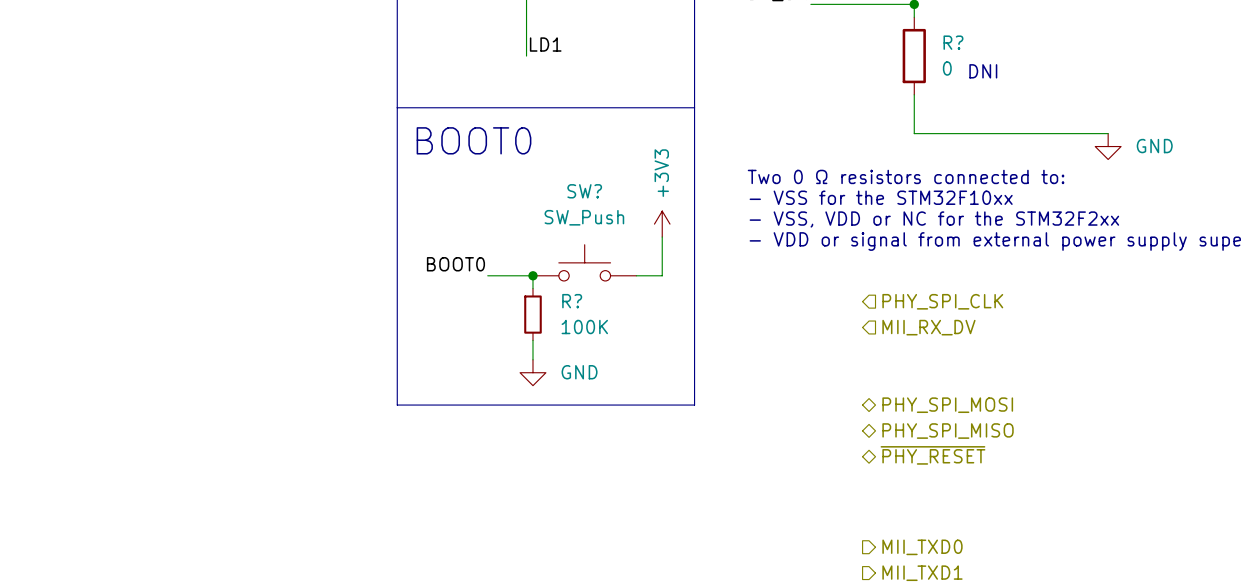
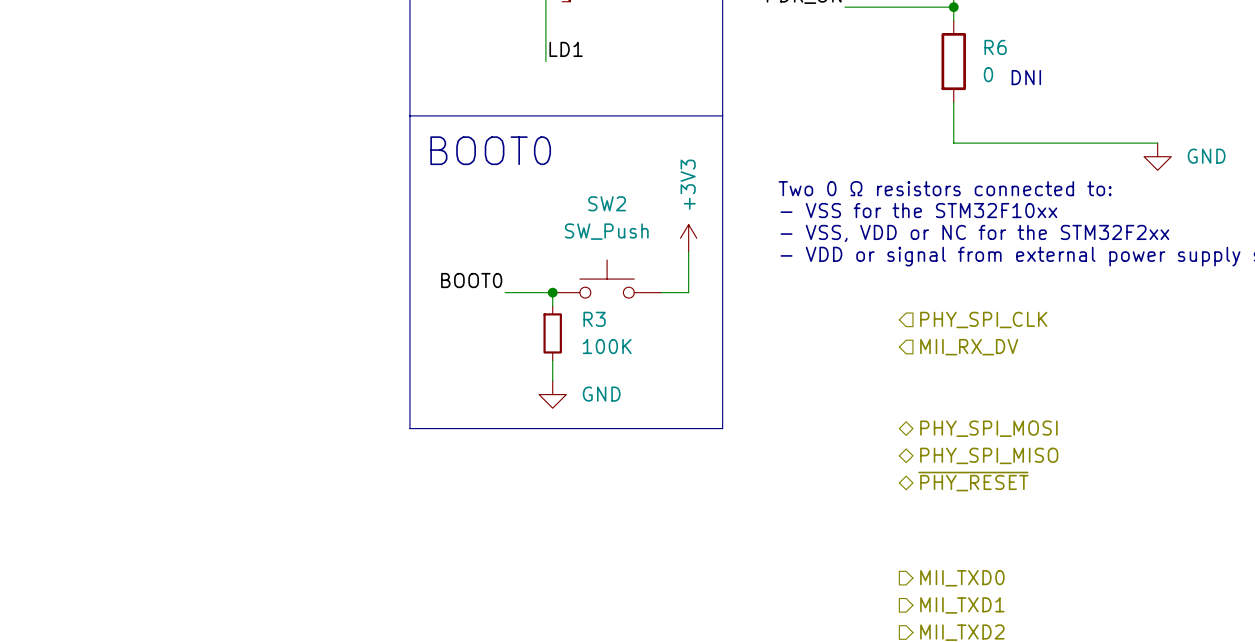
R? name: R? (953, 42) -> R6 (995, 47)
SW? name: SW? (584, 191) -> SW2 (607, 203)
R? name: R? (572, 301) -> R3 (594, 319)

